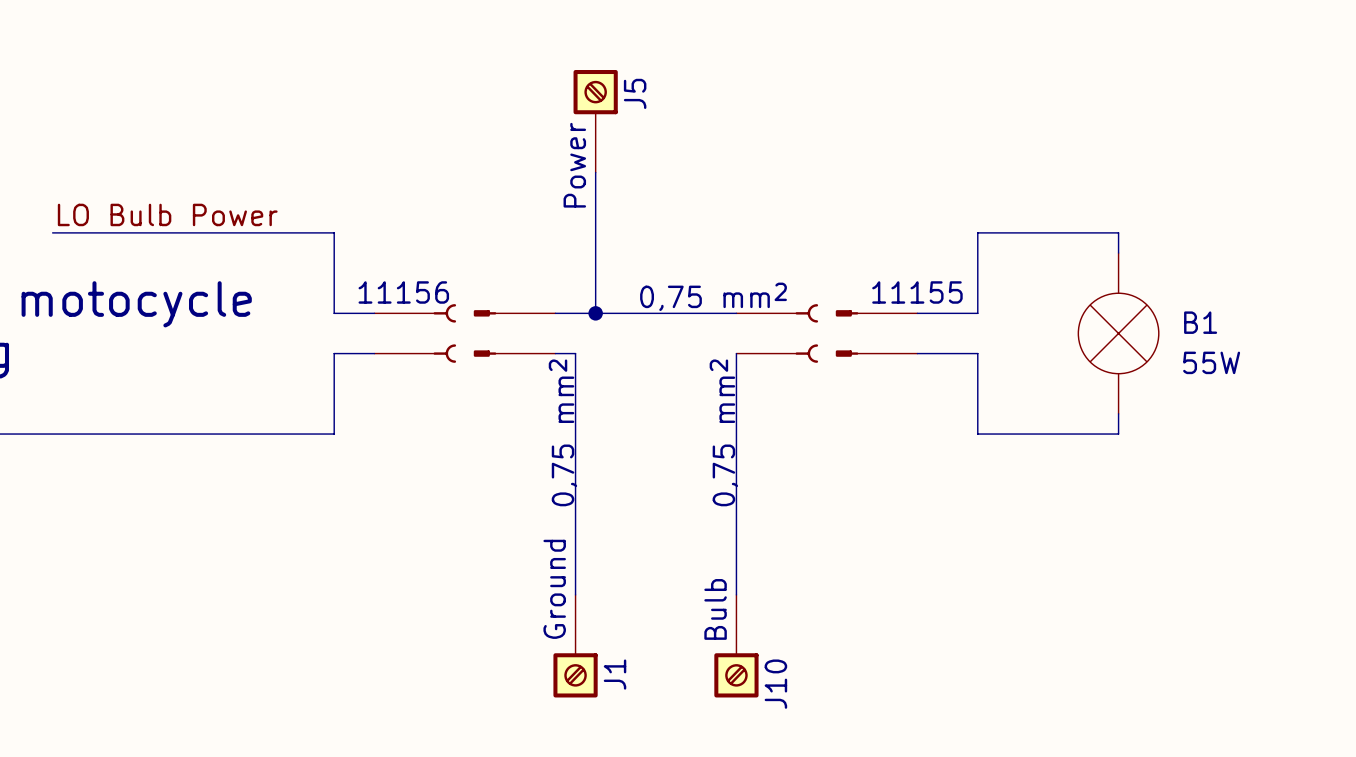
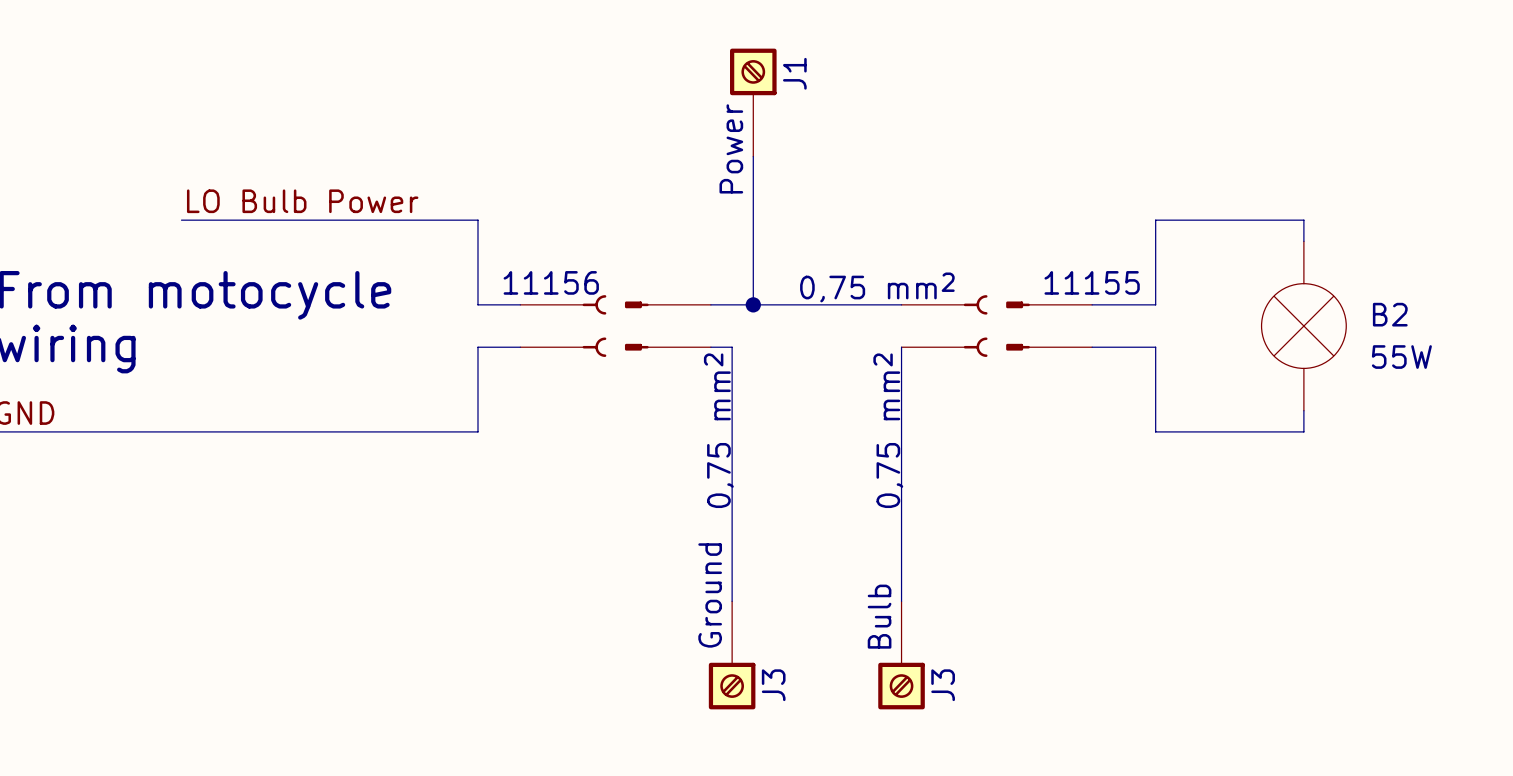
J5 name: J5 (635, 93) -> J1 (794, 73)
B1 name: B1 (1200, 322) -> B2 (1390, 314)
J1 name: J1 (615, 674) -> J3 (773, 685)
J10 name: J10 (775, 684) -> J3 (943, 685)

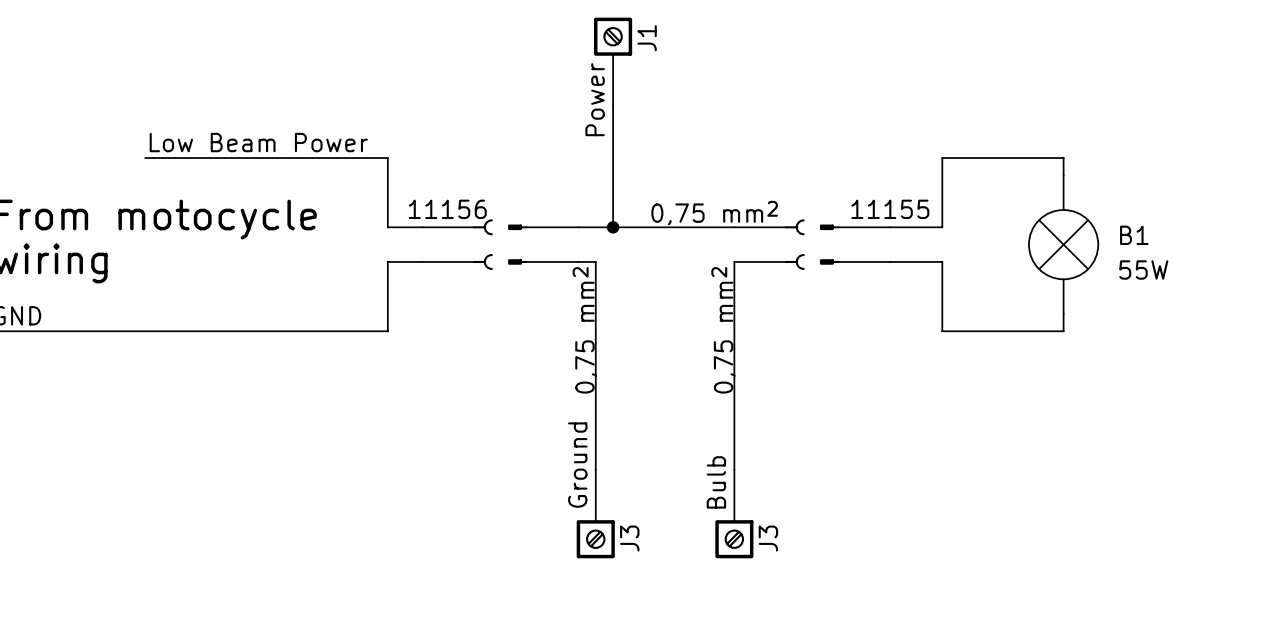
label: LO Bulb Power (302, 201) -> Low Beam Power (258, 142)
B2 name: B2 (1390, 314) -> B1 (1134, 235)

